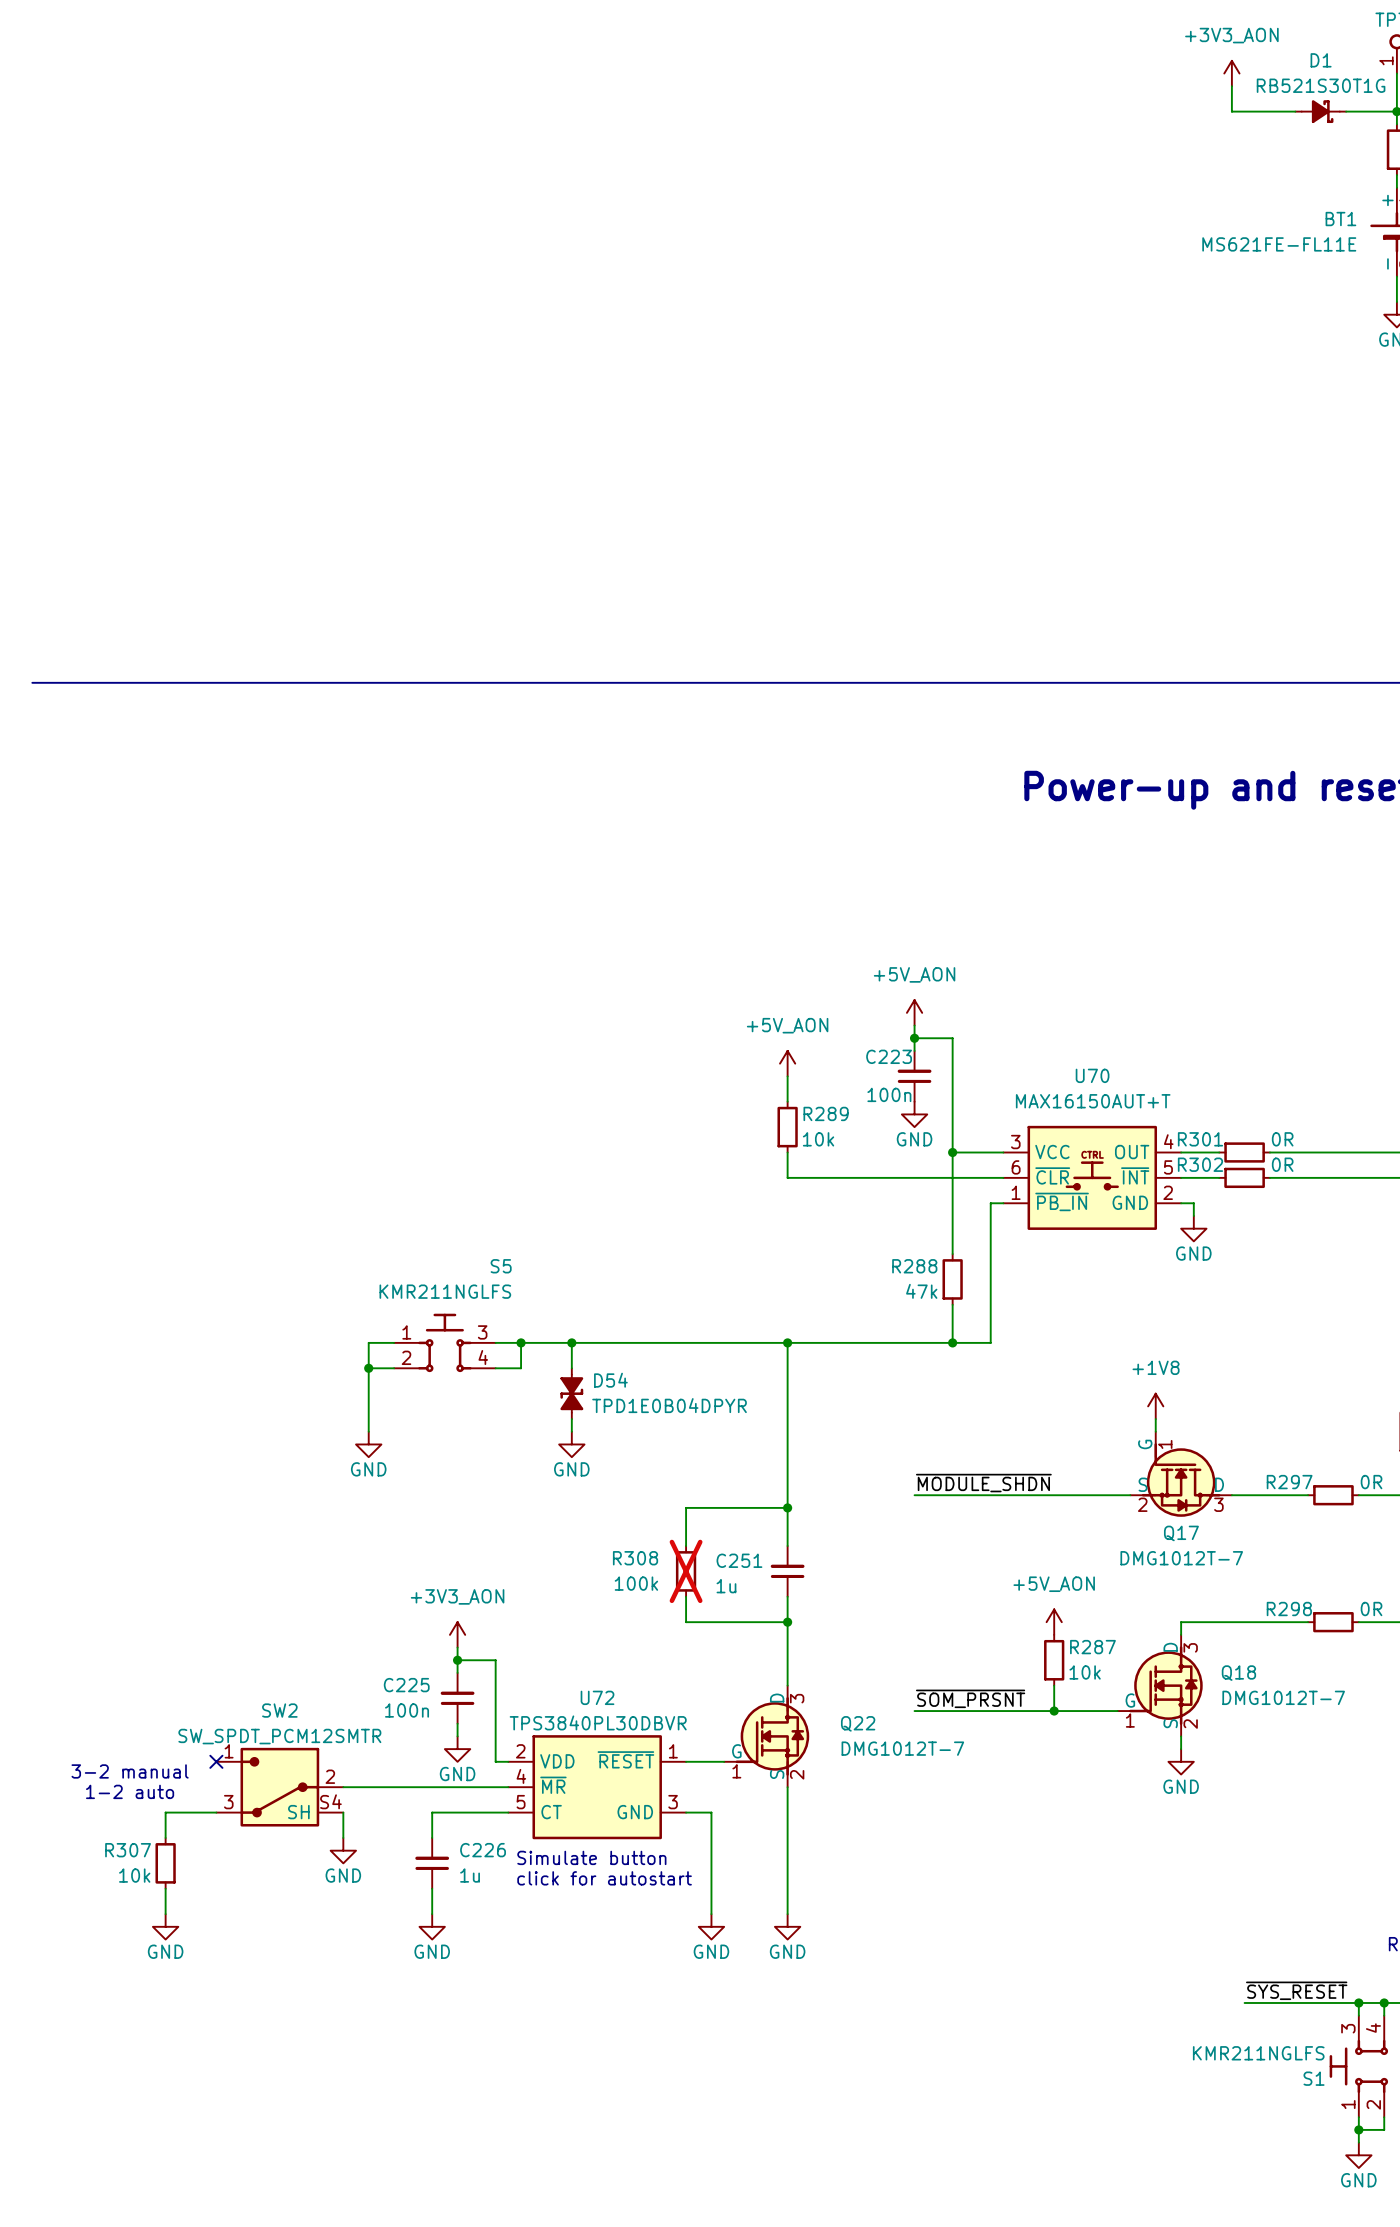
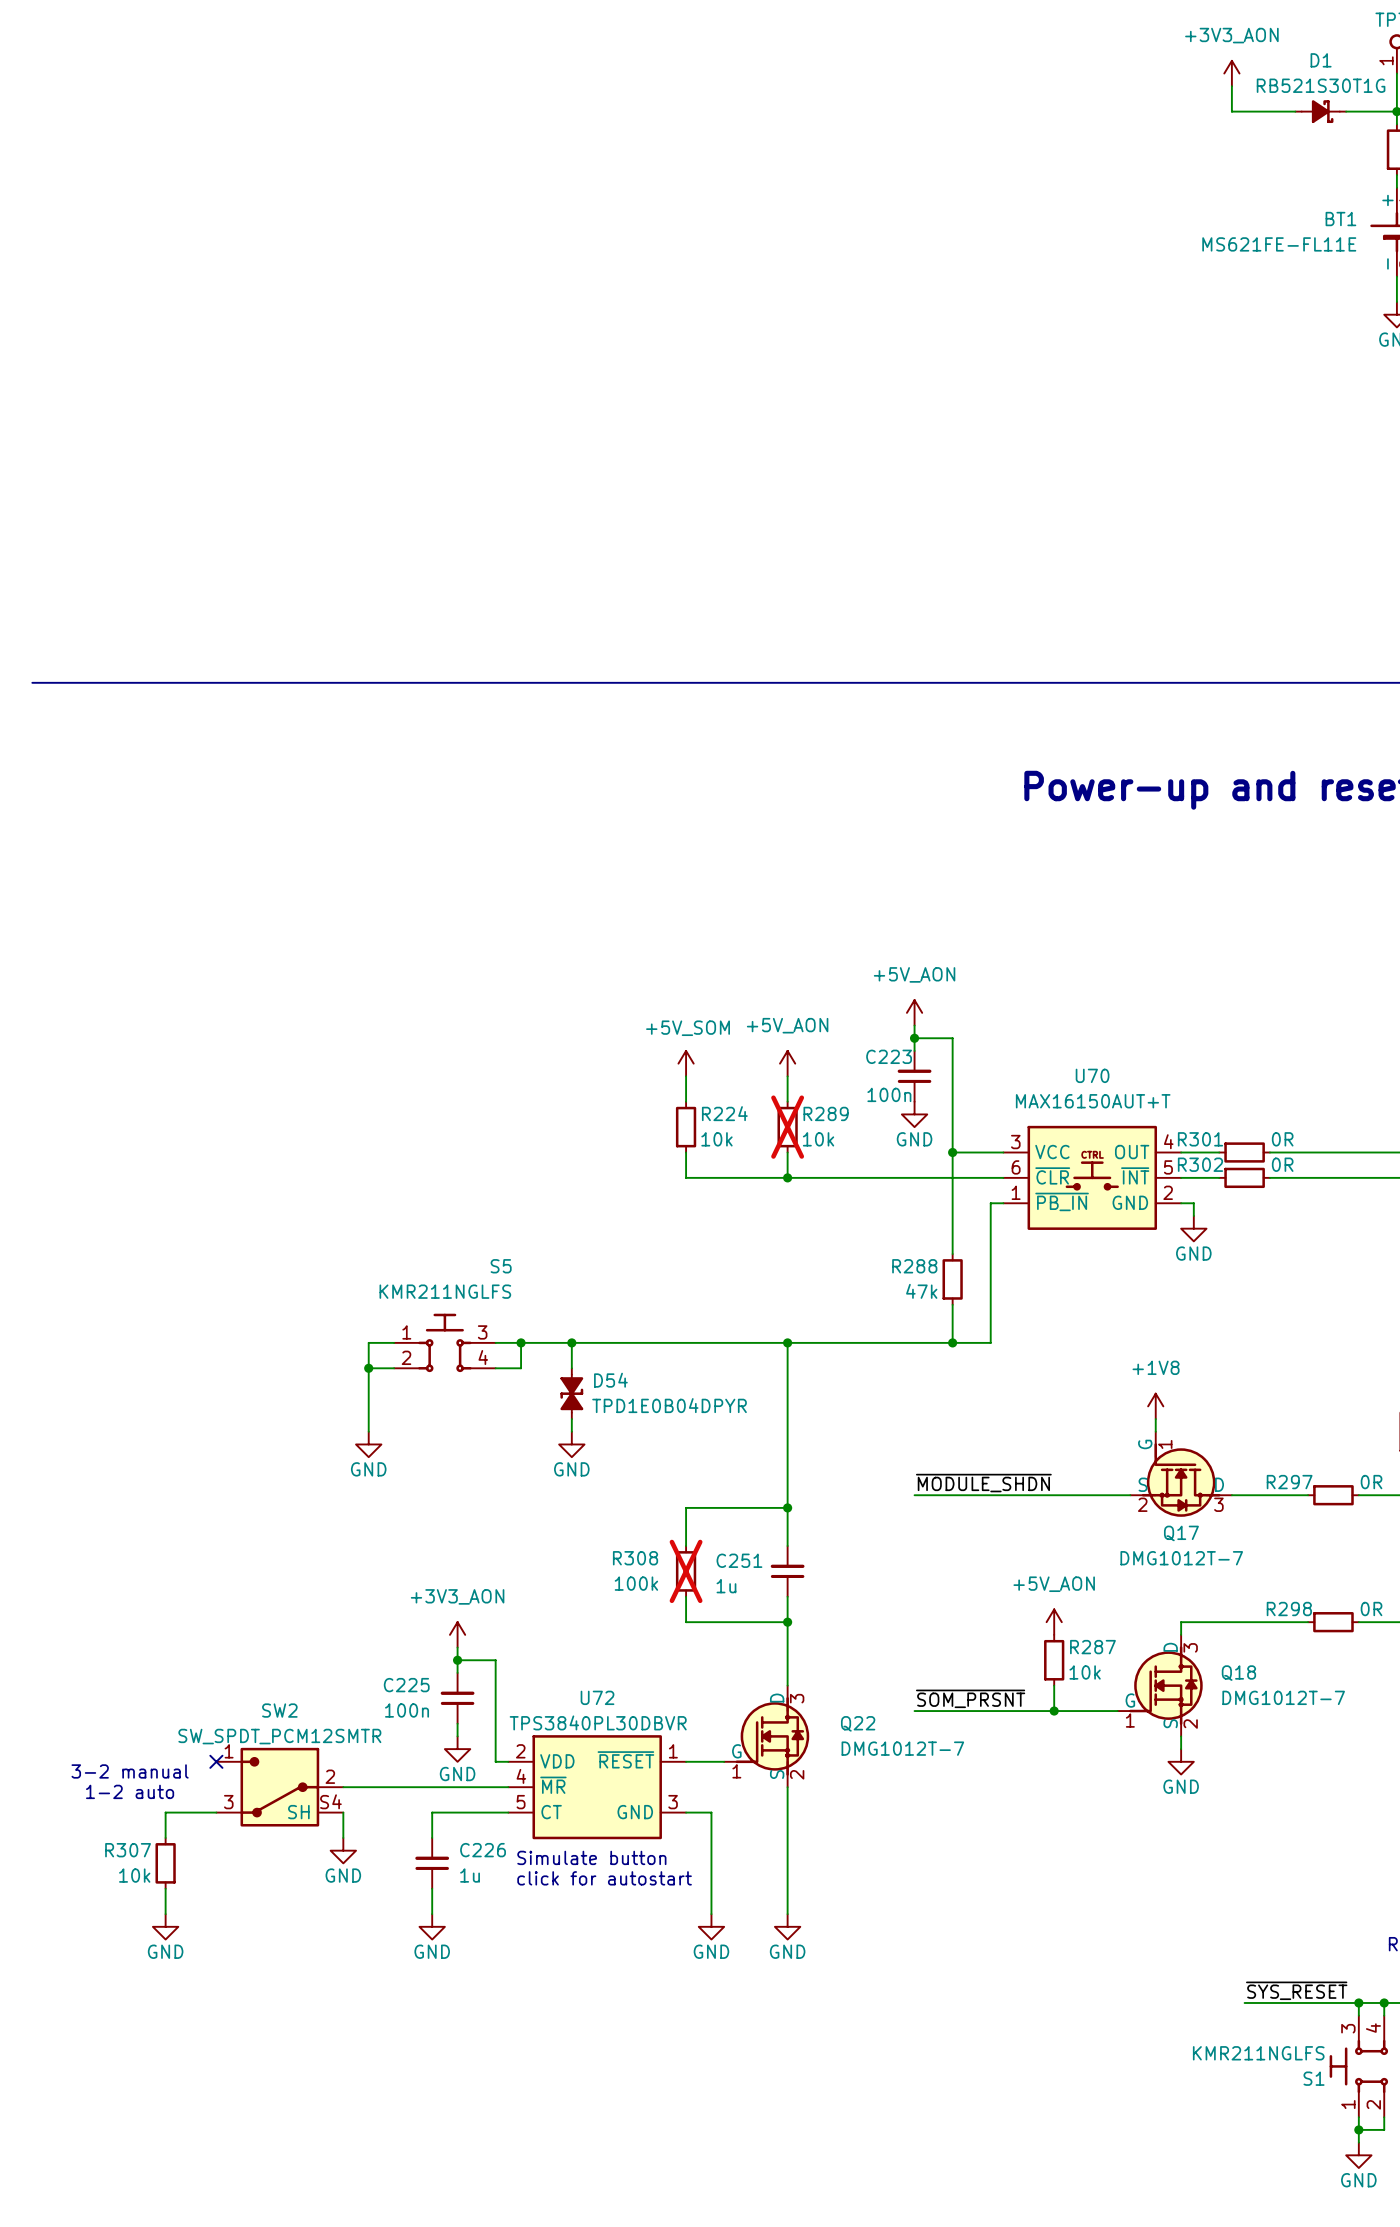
power symbol: none -> +5V_SOM (686, 1063)
wire: none -> (686, 1076) (686, 1101)
R224: none -> (686, 1127)
R289 do-not-place cross: none -> (787, 1127)
wire: none -> (686, 1152) (686, 1177) (787, 1177)
junction: none -> (787, 1177)

